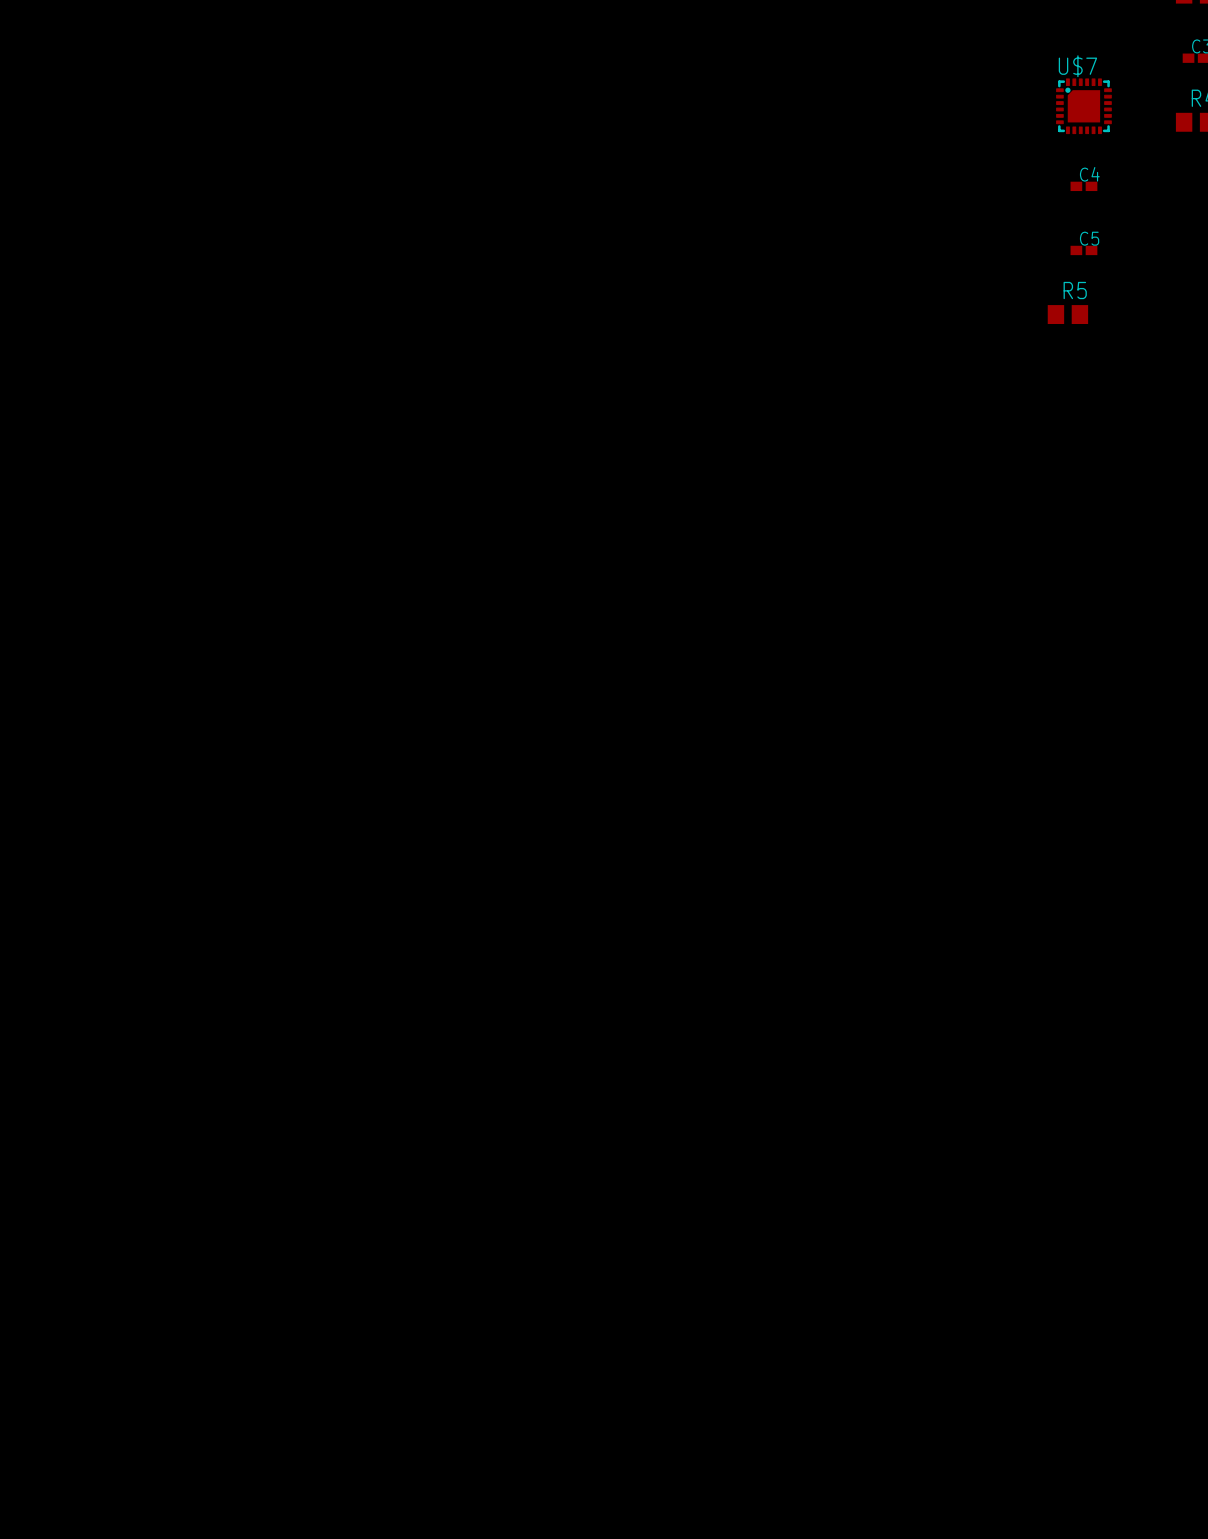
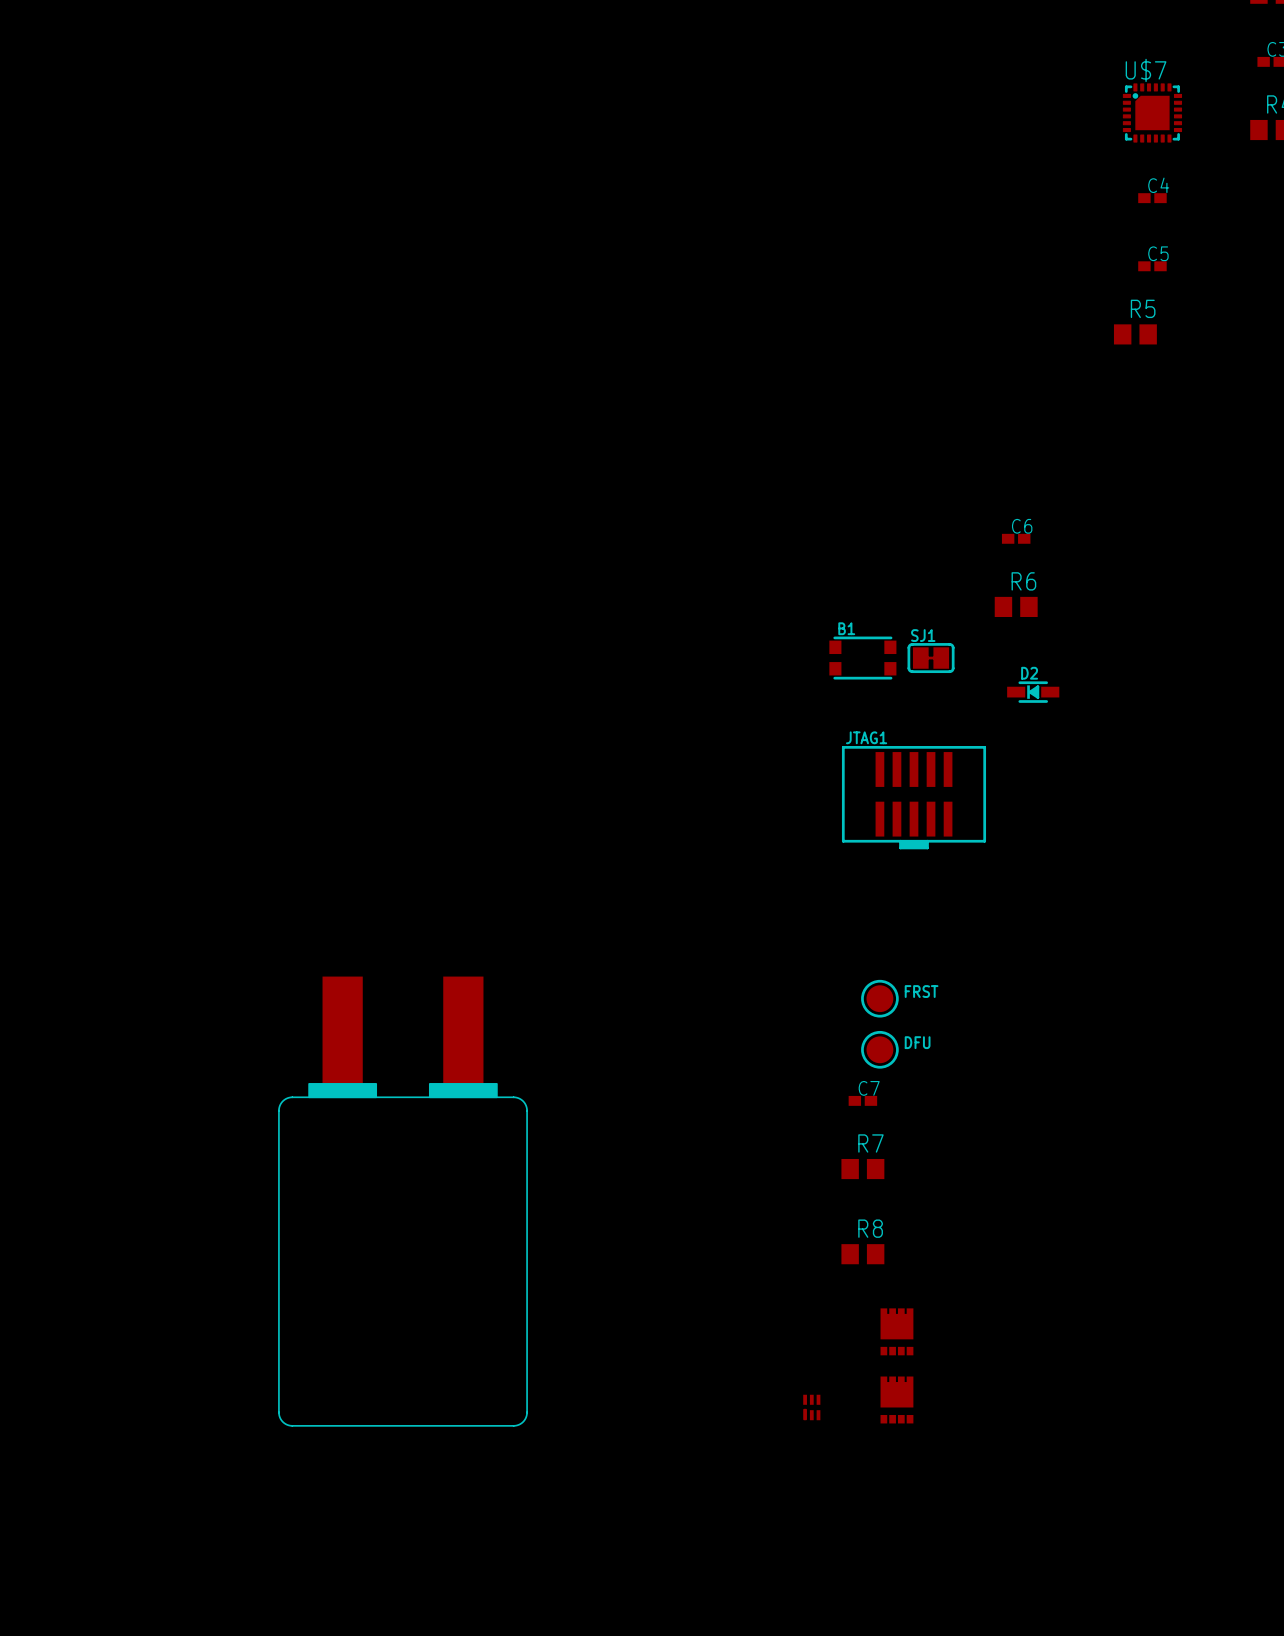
C6: none -> (1016, 538)
R6: none -> (1016, 606)
B1: none -> (862, 658)
SJ1: none -> (931, 658)
D2: none -> (1033, 692)
JTAG1: none -> (913, 797)
FRST: none -> (879, 998)
DFU: none -> (879, 1049)
C7: none -> (862, 1100)
R7: none -> (862, 1169)
part: none -> (403, 1201)
R8: none -> (862, 1254)
part: none -> (896, 1331)
part: none -> (896, 1399)
part: none -> (811, 1407)

